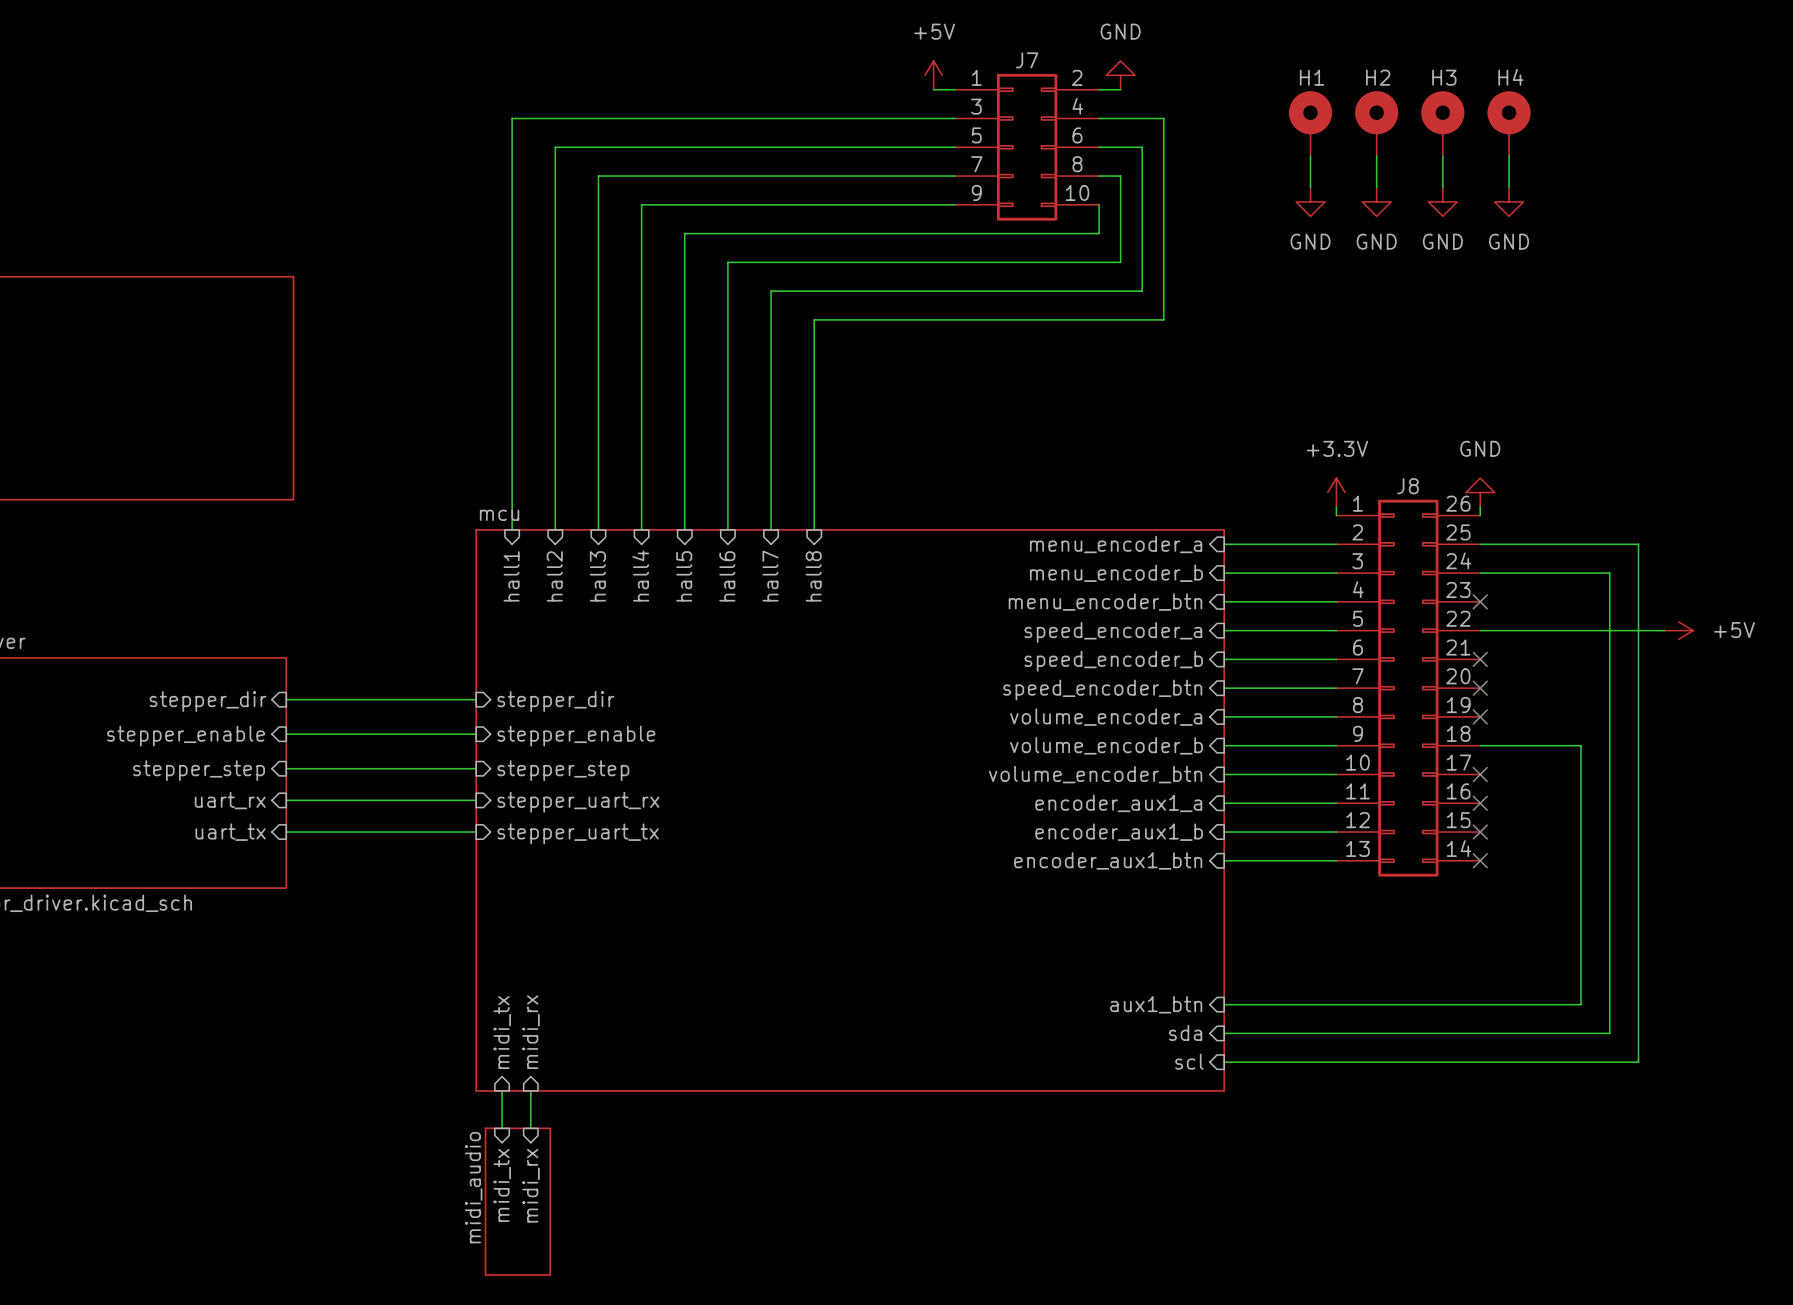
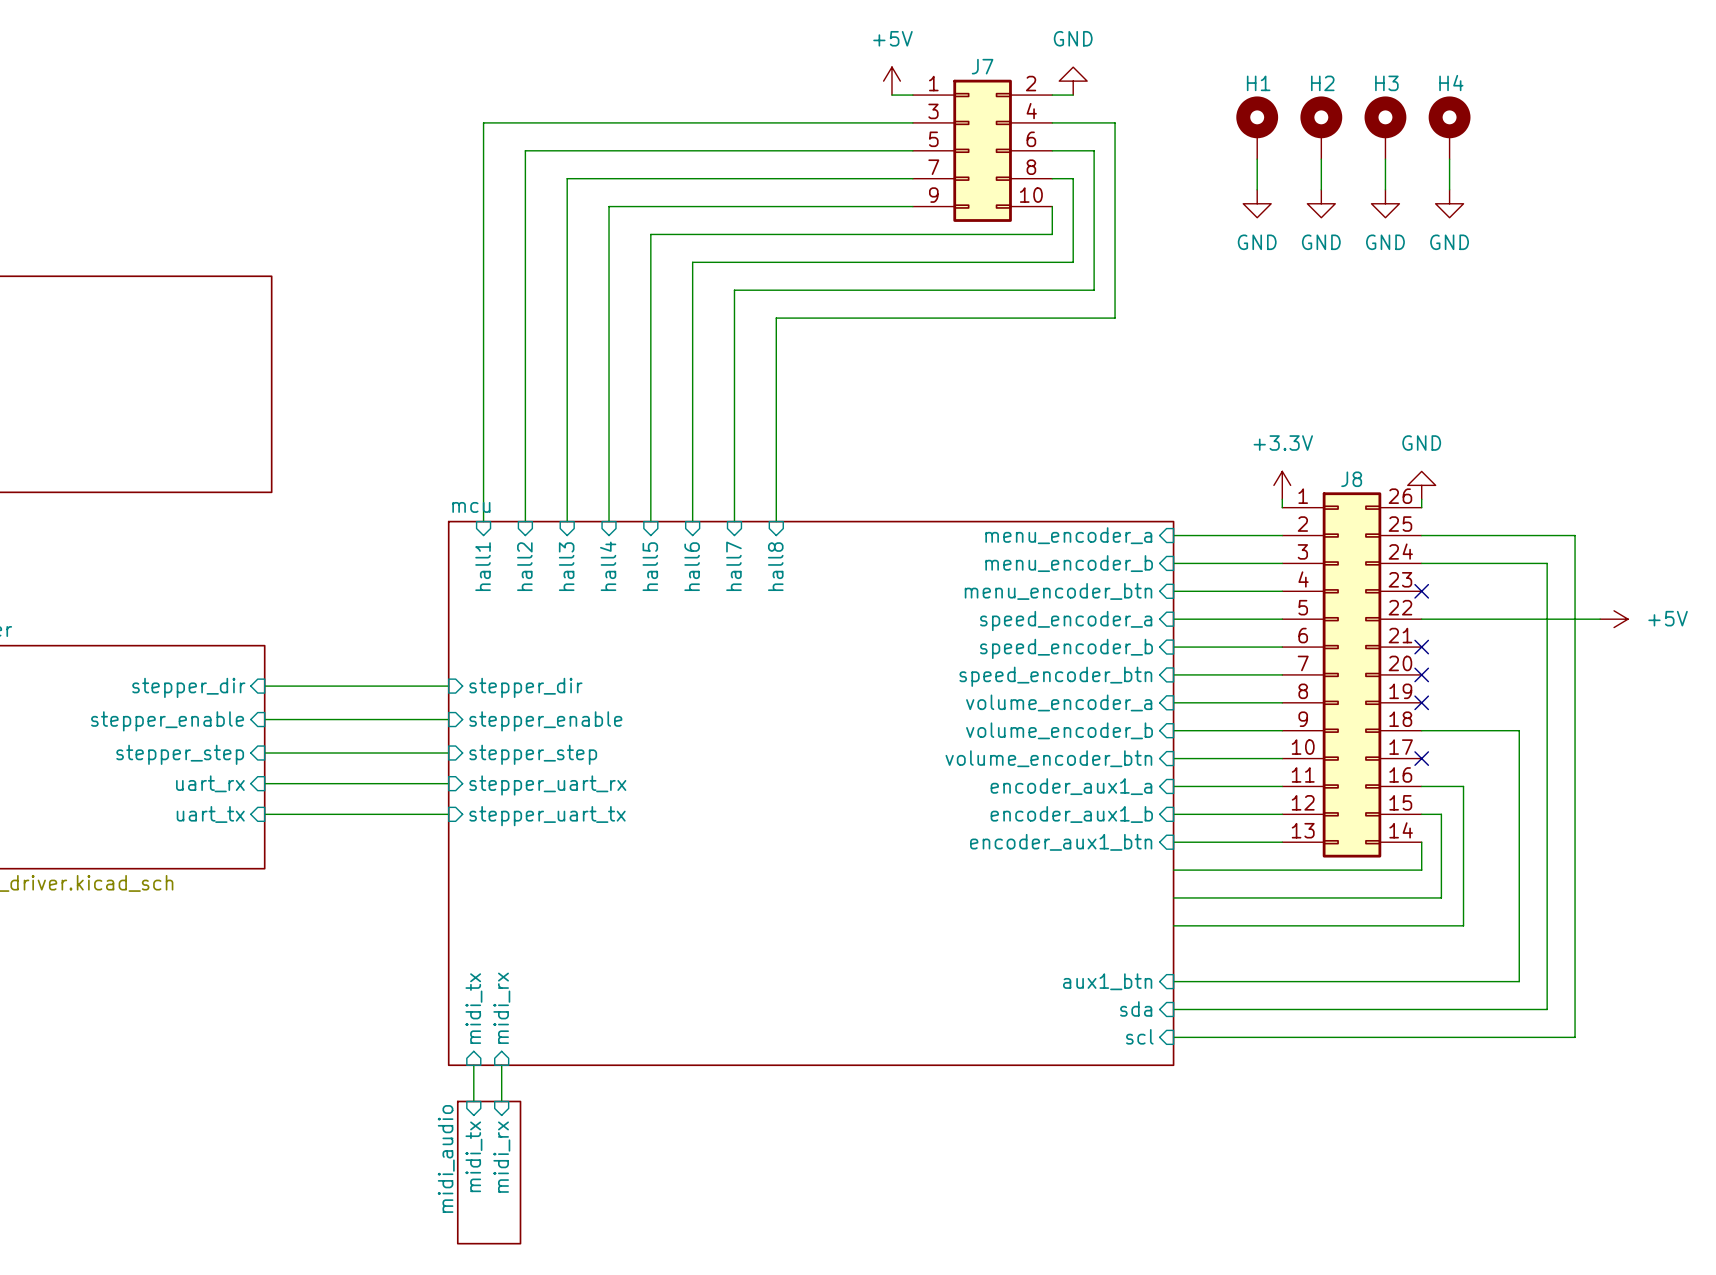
wire: none -> (1421, 786) (1463, 786) (1463, 925) (1173, 925)
no-connect mark: (1480, 803) -> none
wire: none -> (1421, 814) (1441, 814) (1441, 897) (1173, 897)
no-connect mark: (1480, 832) -> none
wire: none -> (1421, 842) (1421, 870) (1173, 870)
no-connect mark: (1480, 860) -> none

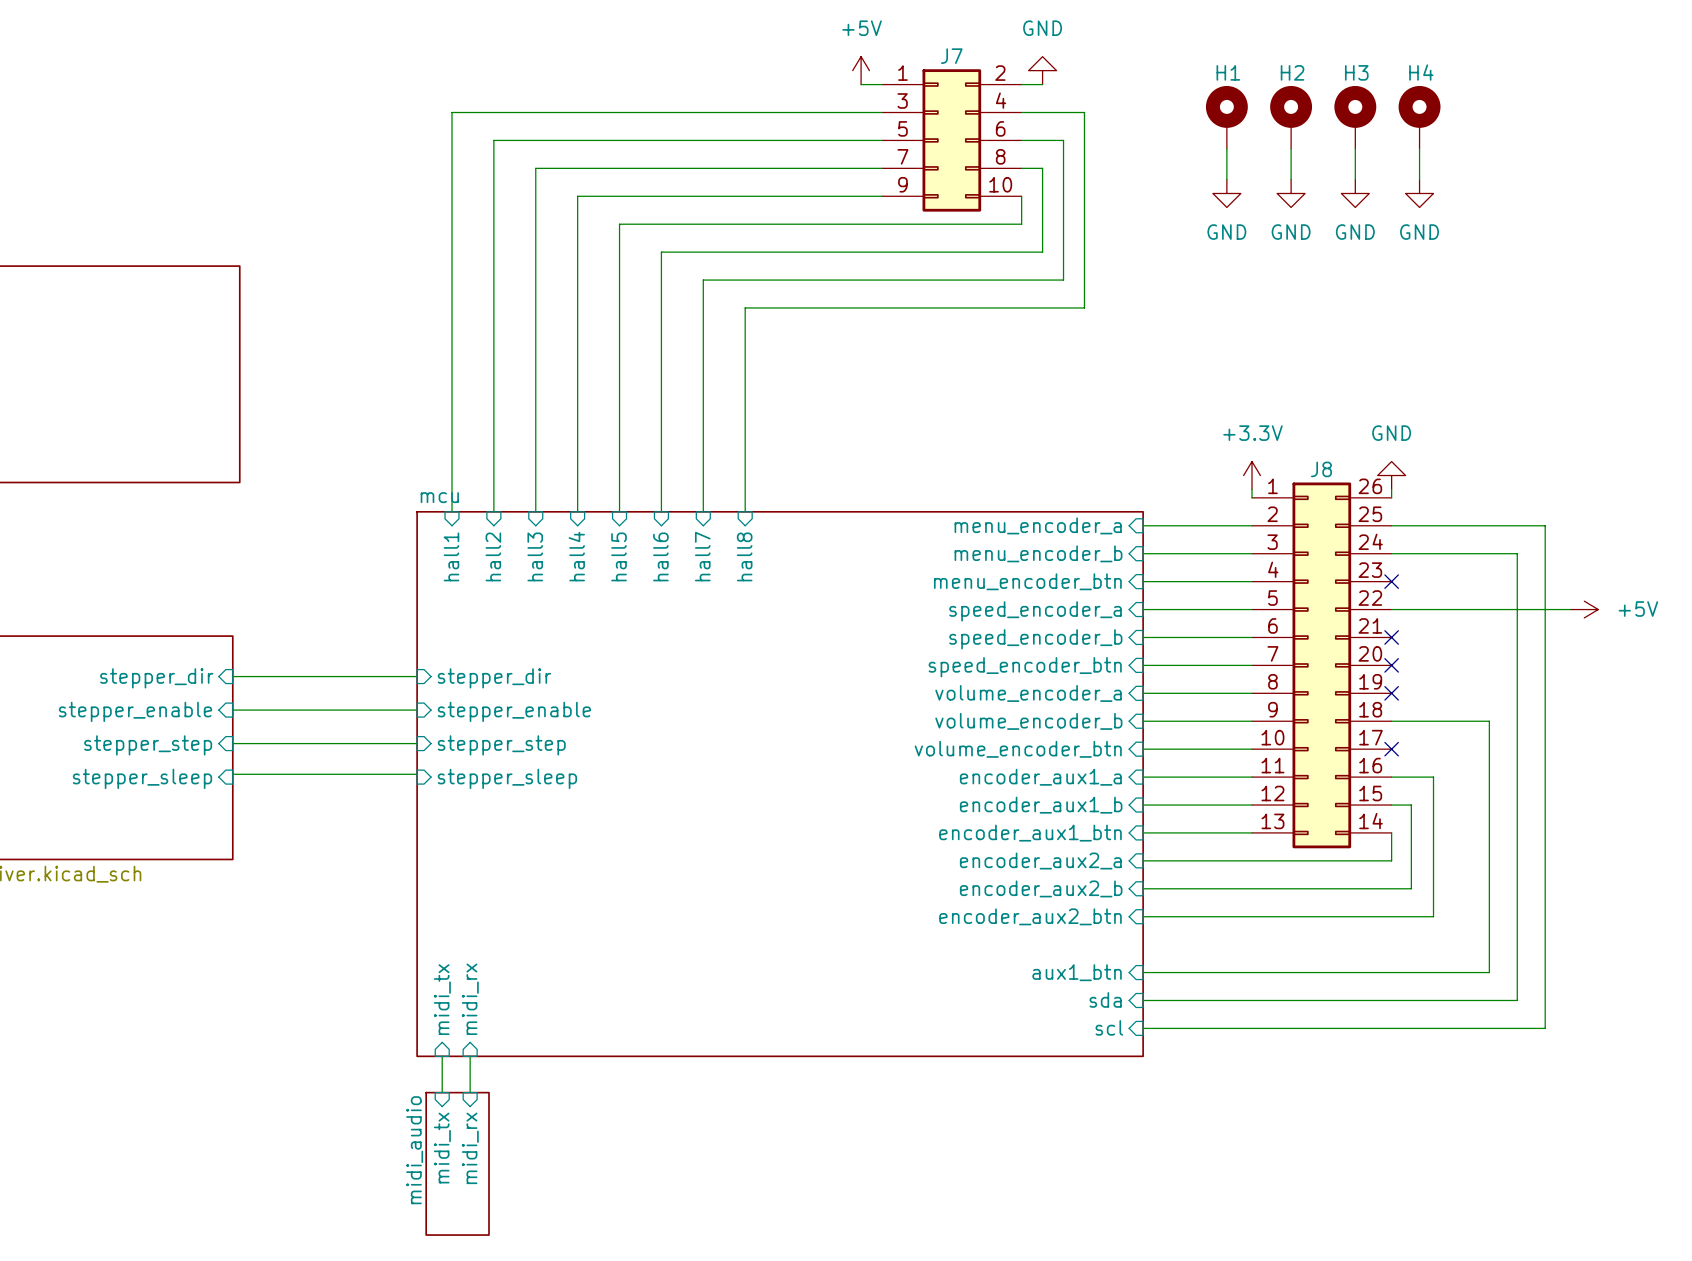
sheet pin: uart_rx (210, 783) -> stepper_sleep (142, 778)
sheet pin: stepper_uart_rx (547, 785) -> stepper_sleep (507, 778)
sheet pin: uart_tx (210, 814) -> none
wire: (264, 814) (448, 814) -> none
sheet pin: stepper_uart_tx (547, 816) -> none
sheet pin: none -> encoder_aux2_a (1040, 861)
sheet pin: none -> encoder_aux2_b (1041, 888)
sheet pin: none -> encoder_aux2_btn (1030, 916)

